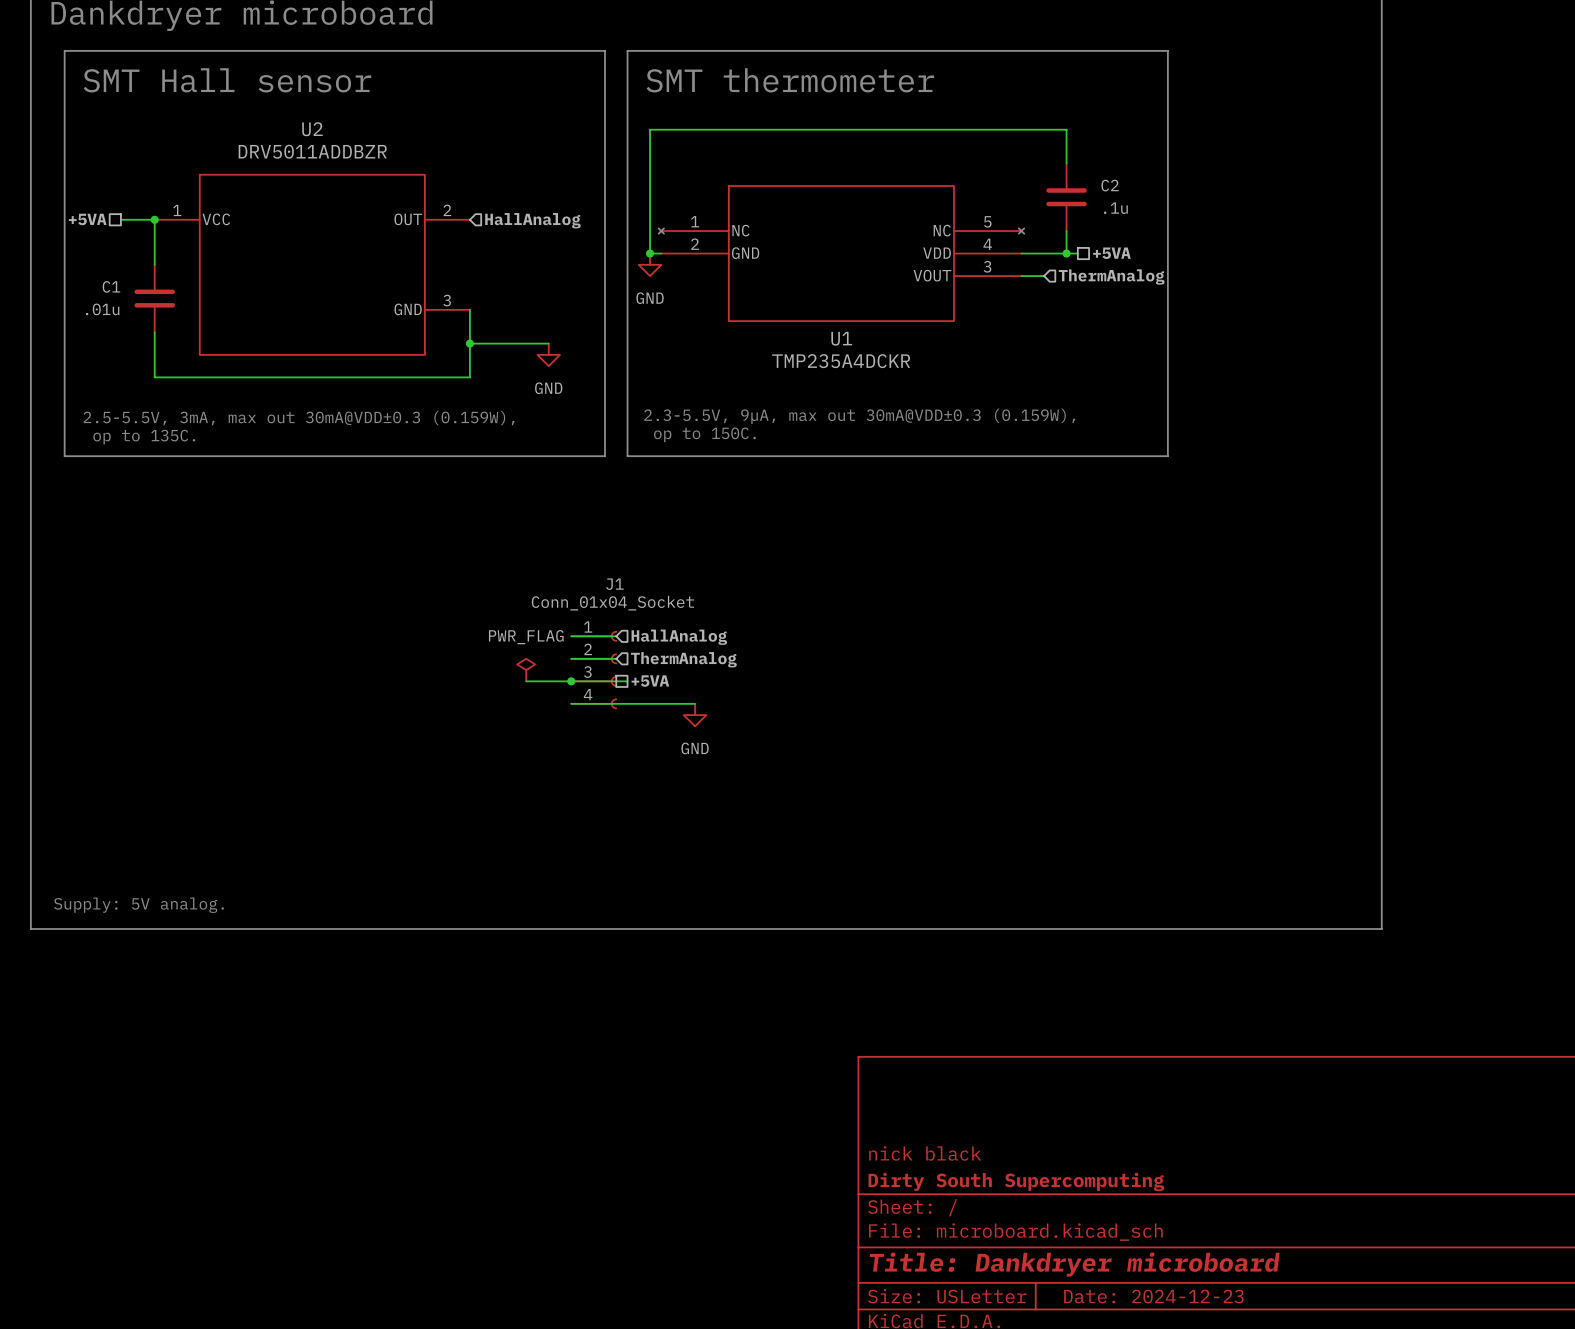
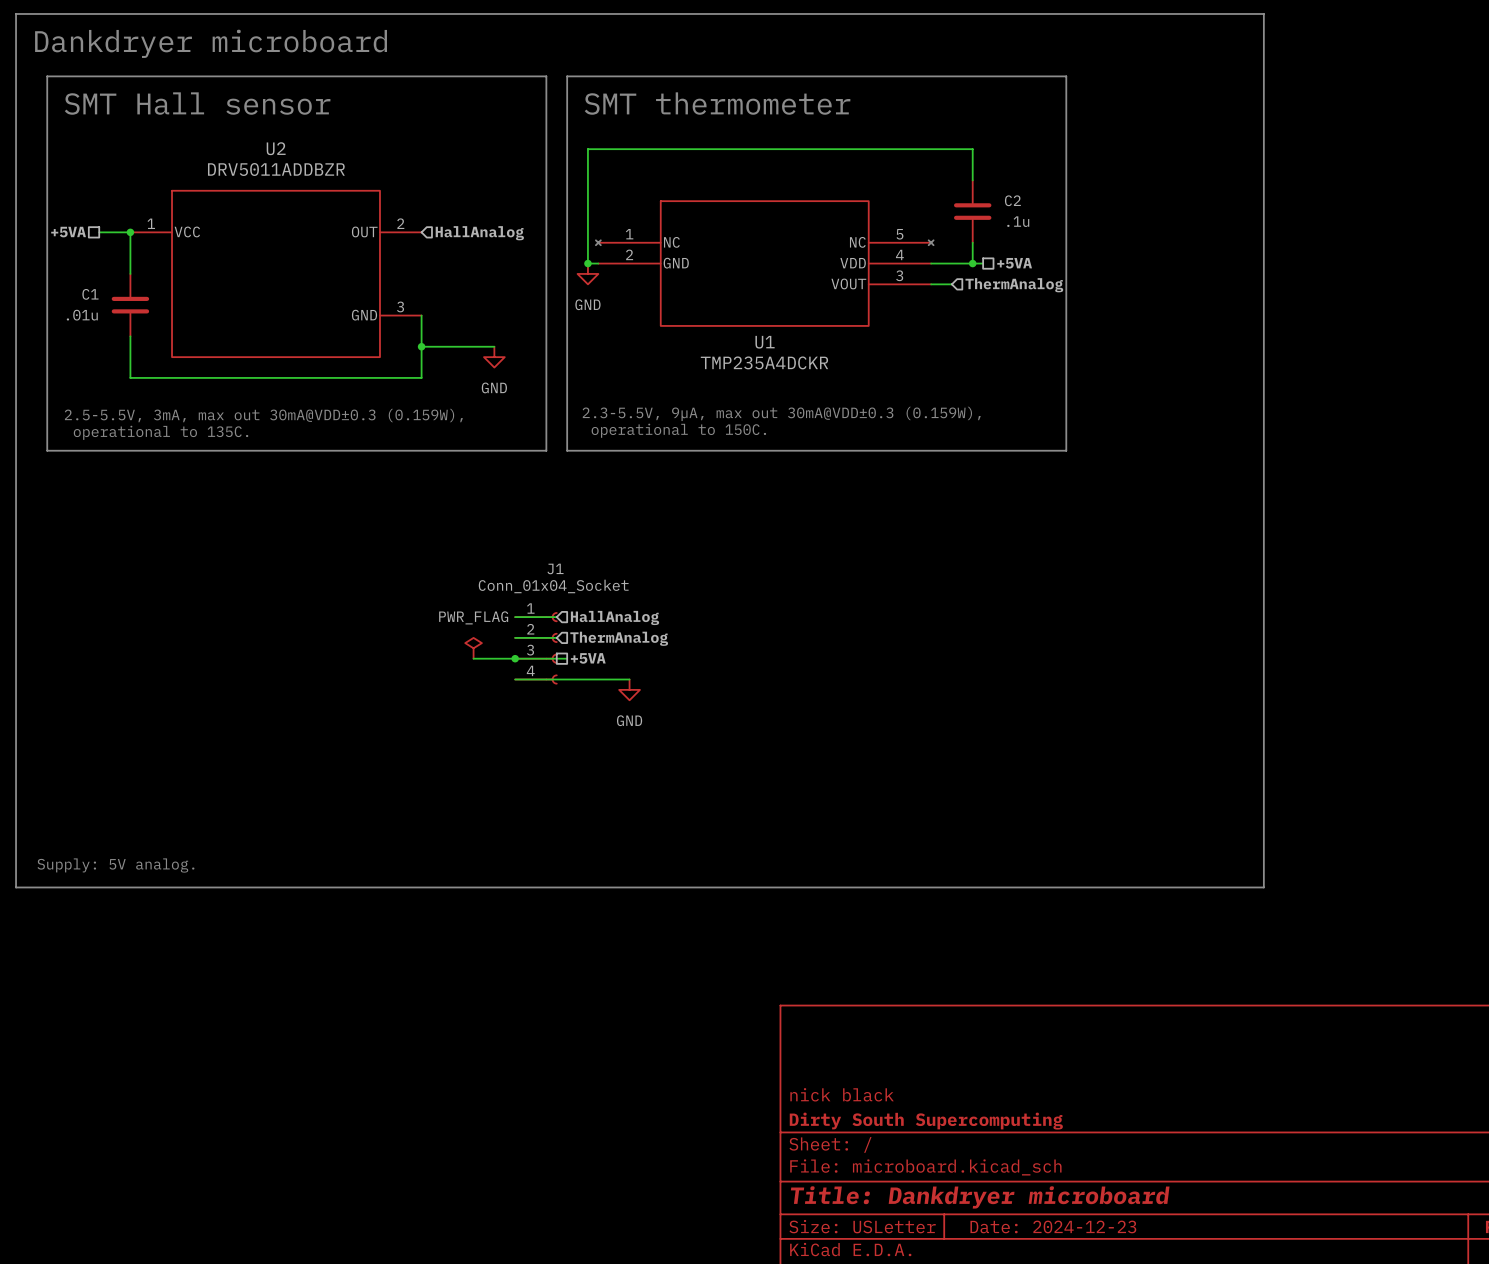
text: op to 150C. (704, 434) -> operational to 150C. (678, 430)
text: op to 135C. (144, 437) -> operational to 135C. (161, 432)

